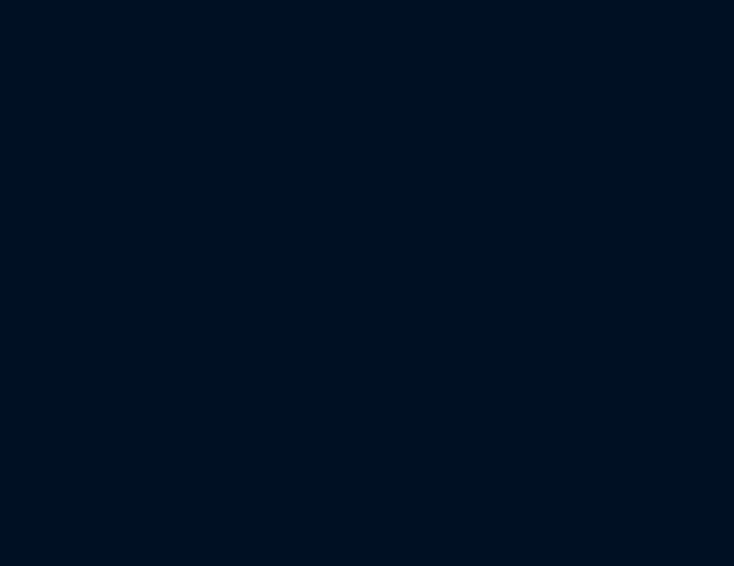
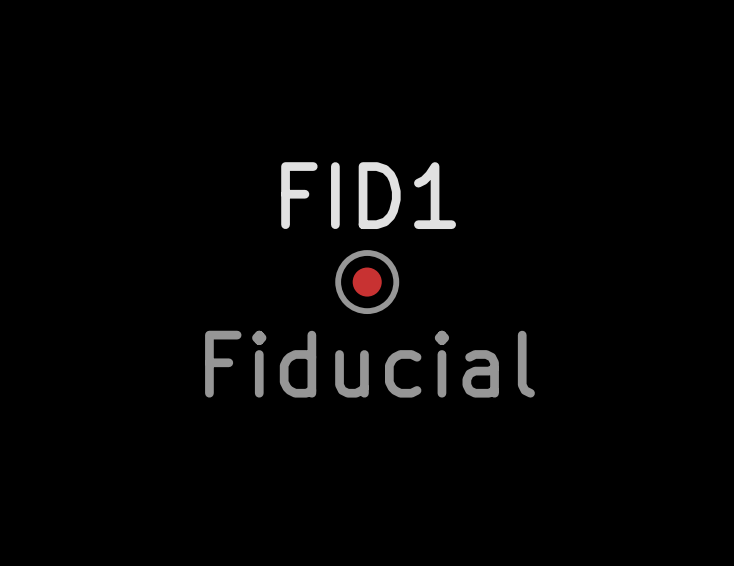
FID1: none -> Fiducial (367, 282)

